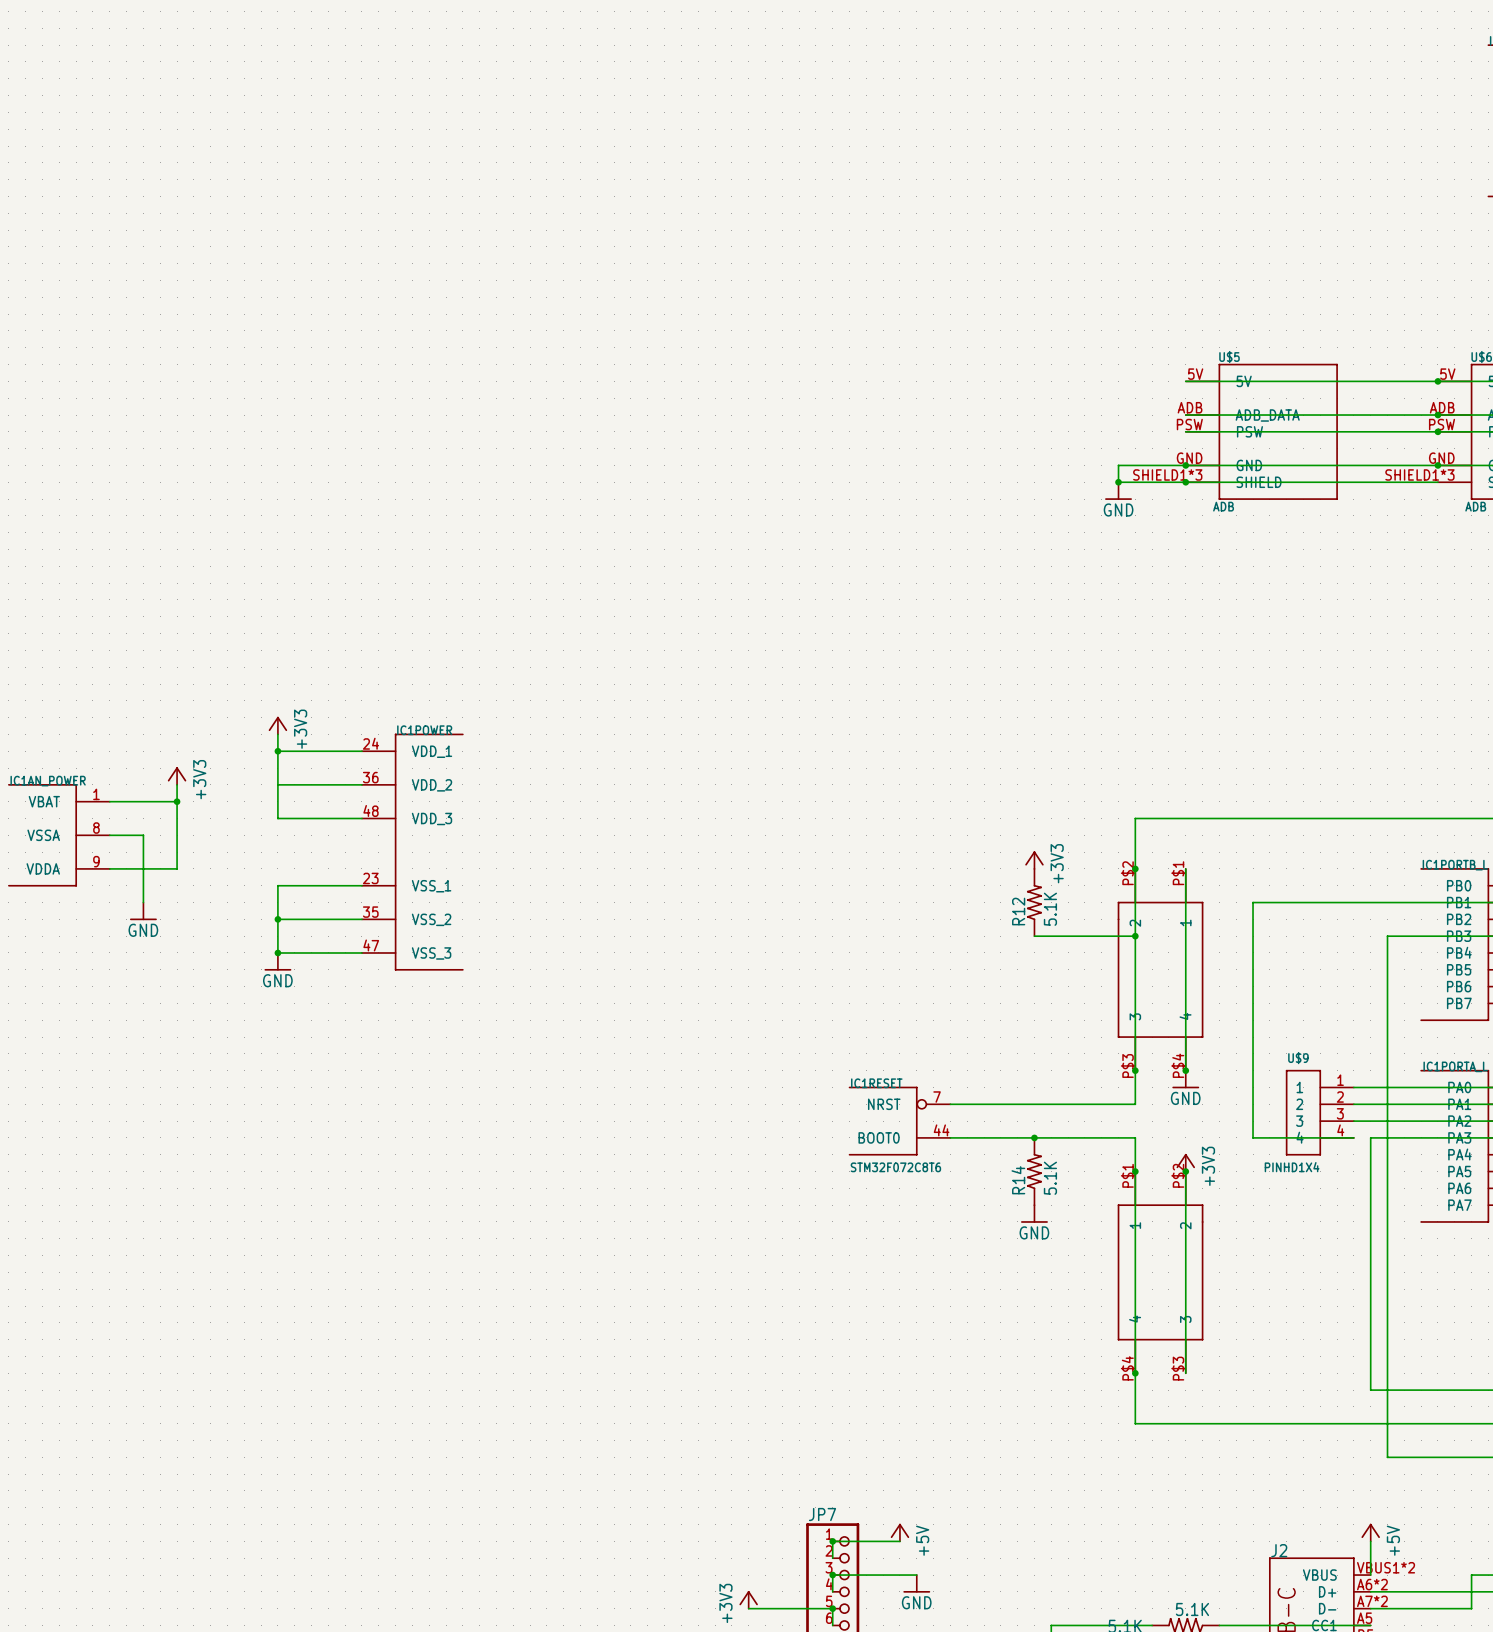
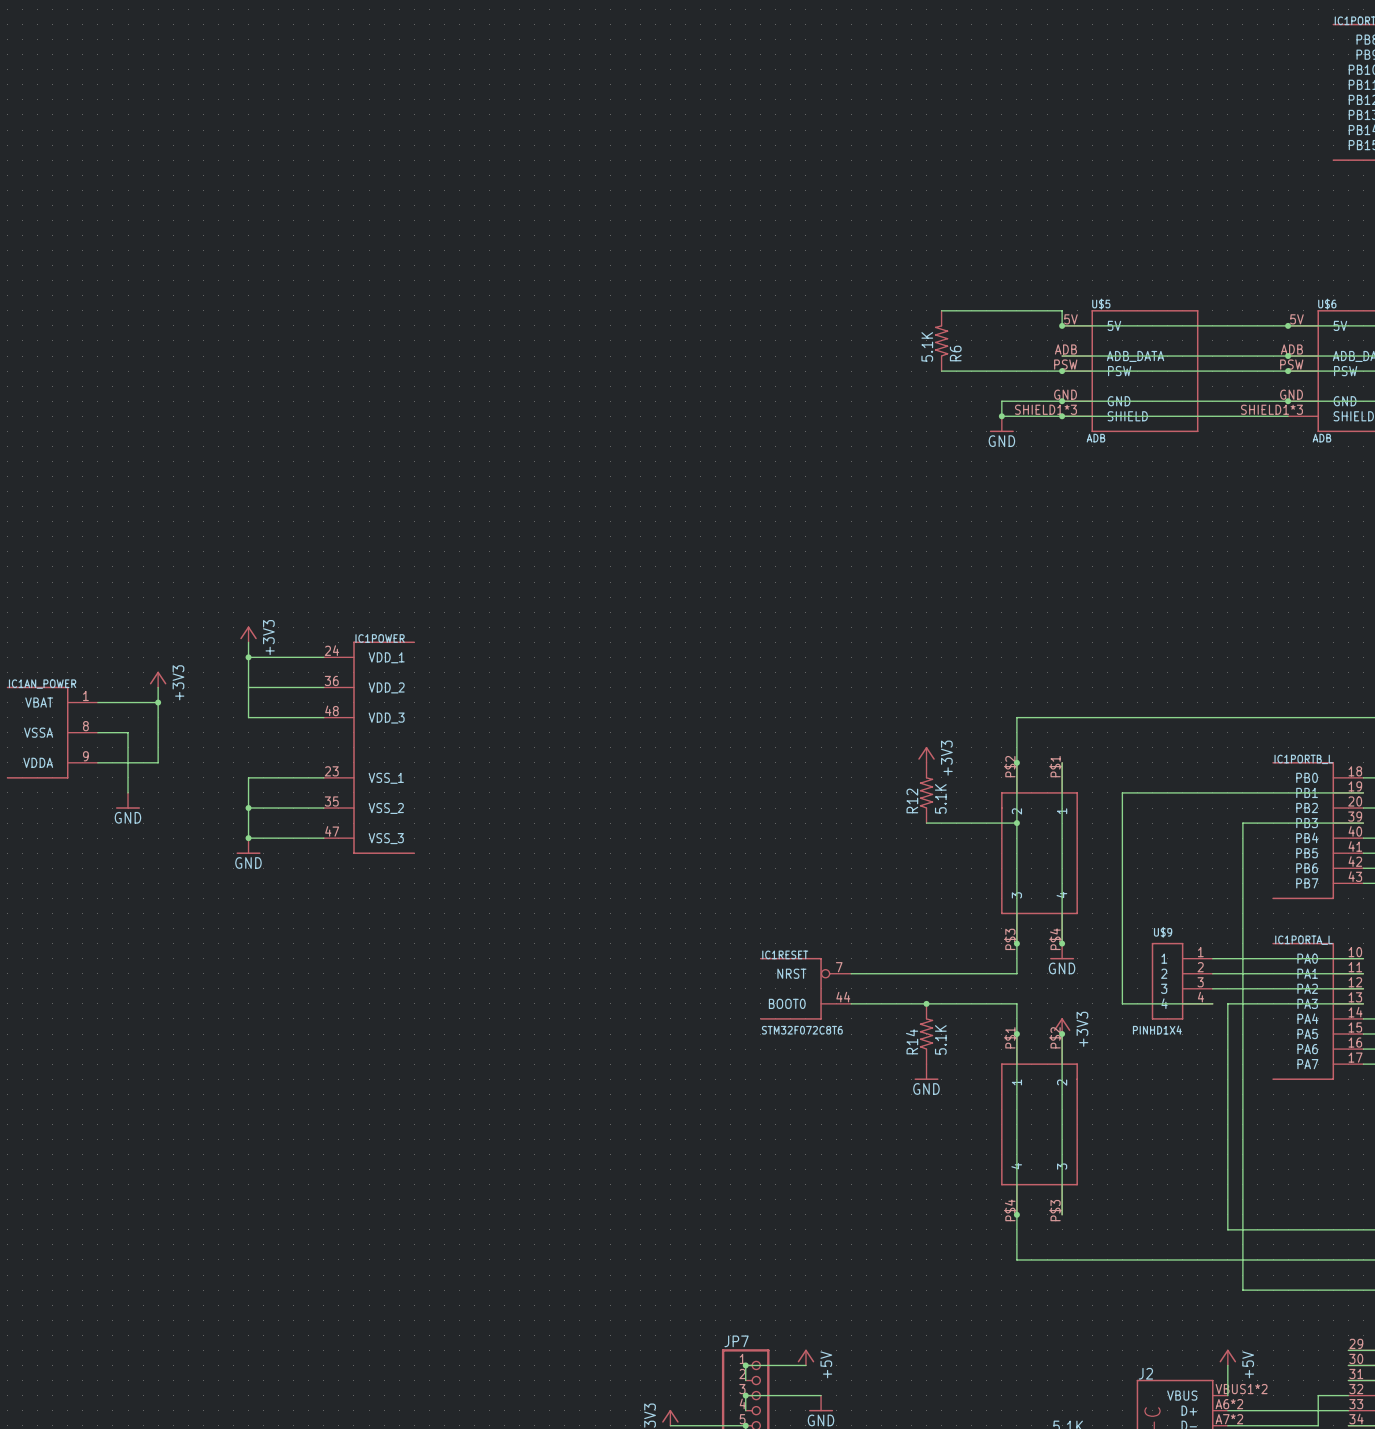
wire: none -> (941, 310) (1062, 310) (1062, 325)
junction: none -> (1062, 325)
R6: none -> 5.1K (941, 340)
wire: none -> (941, 371) (1062, 371)
junction: none -> (1062, 371)

